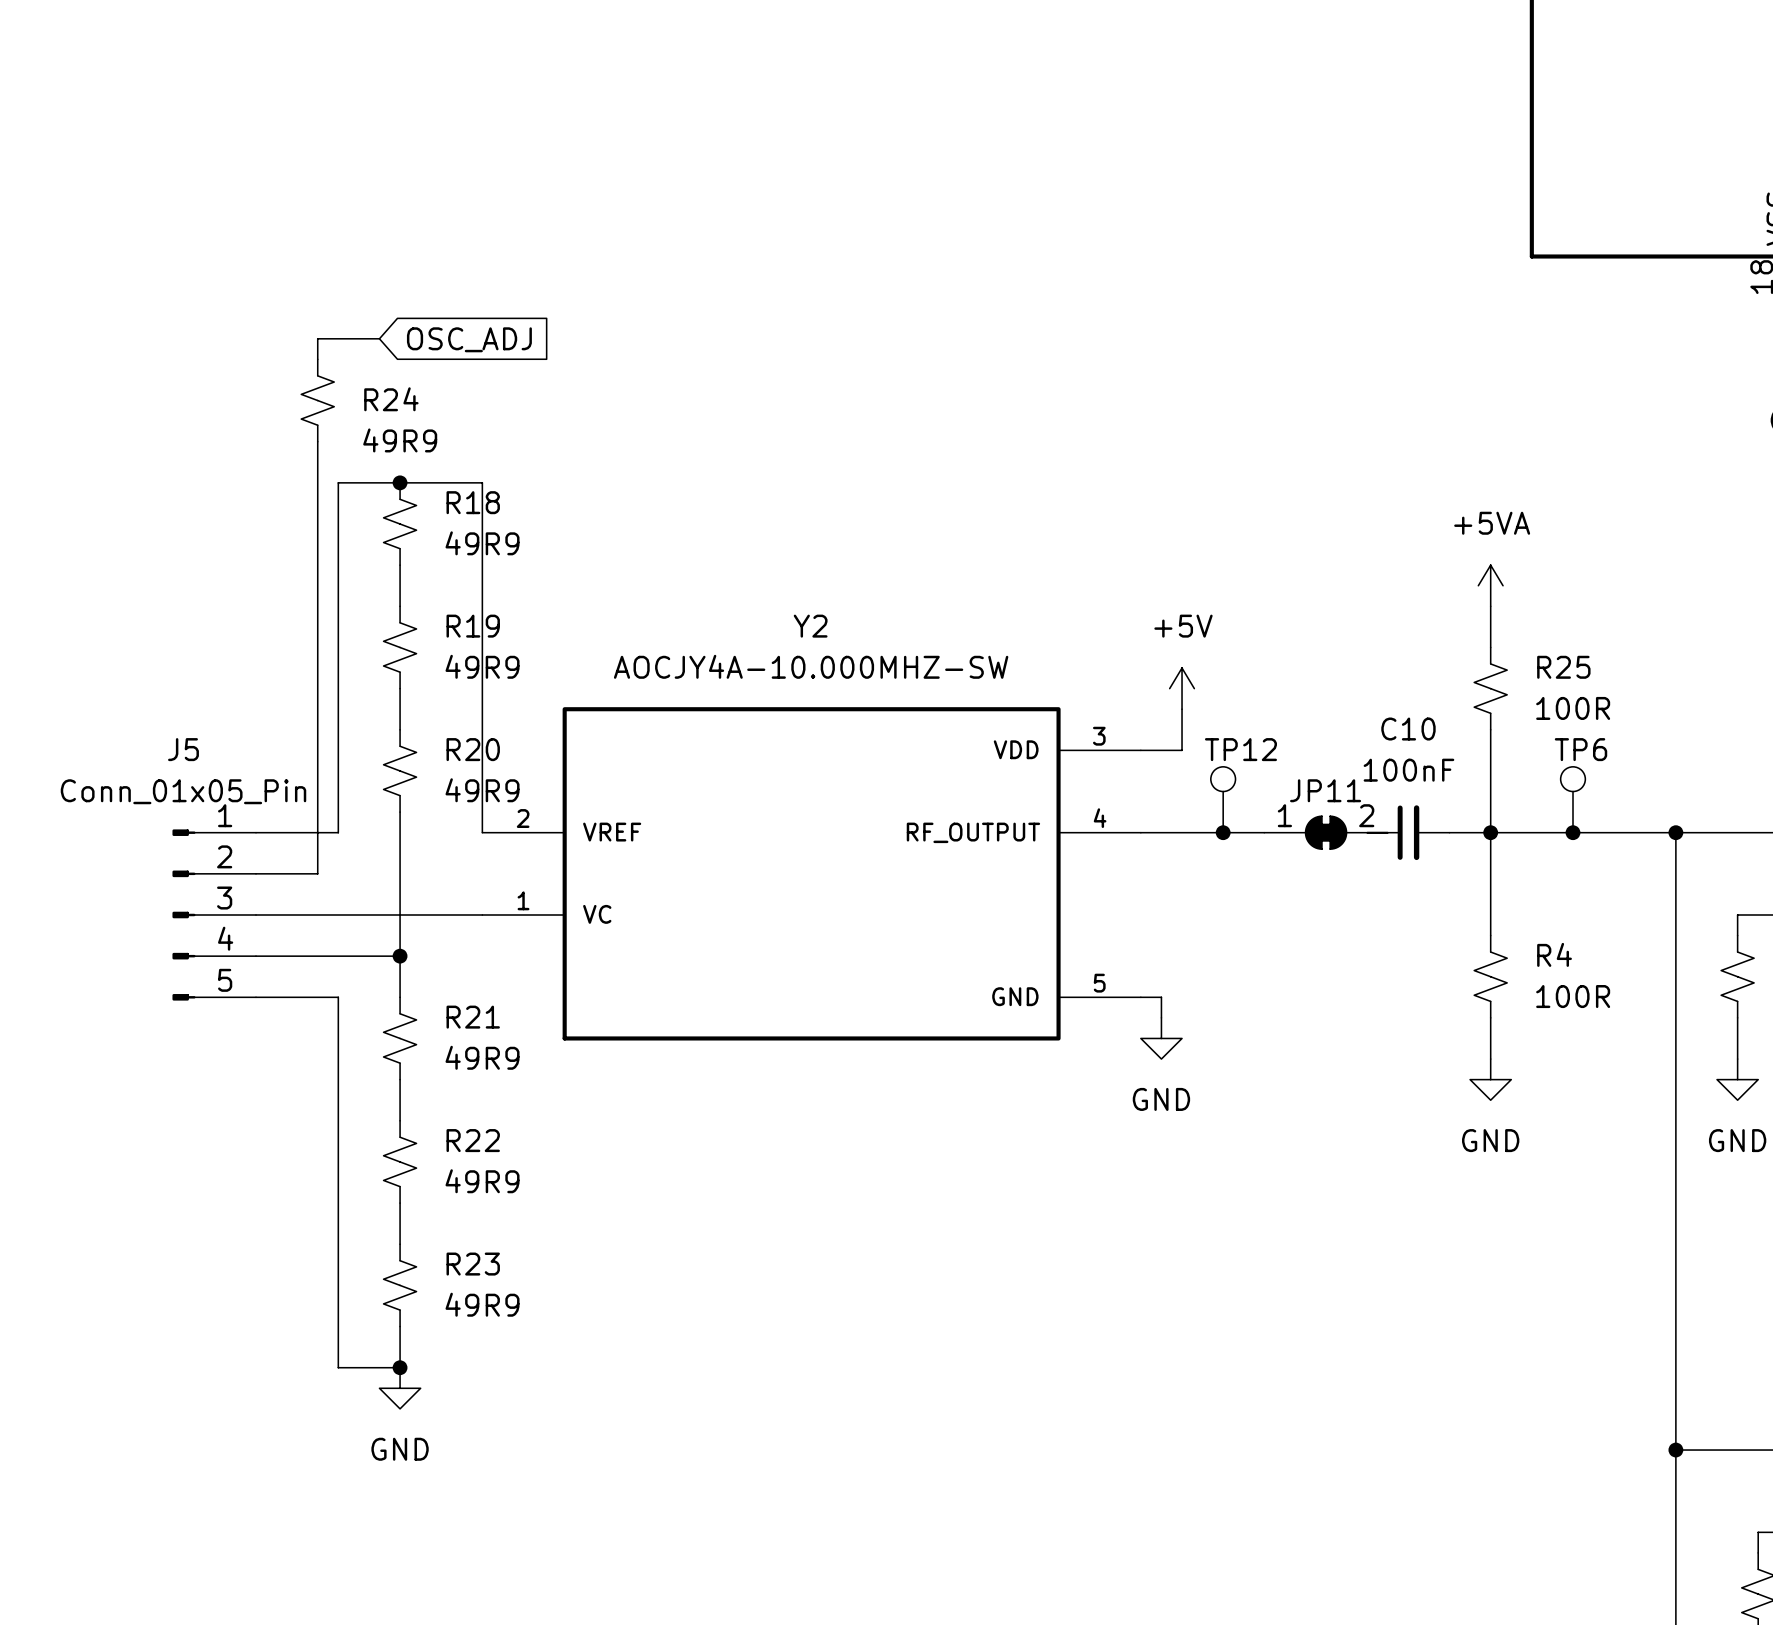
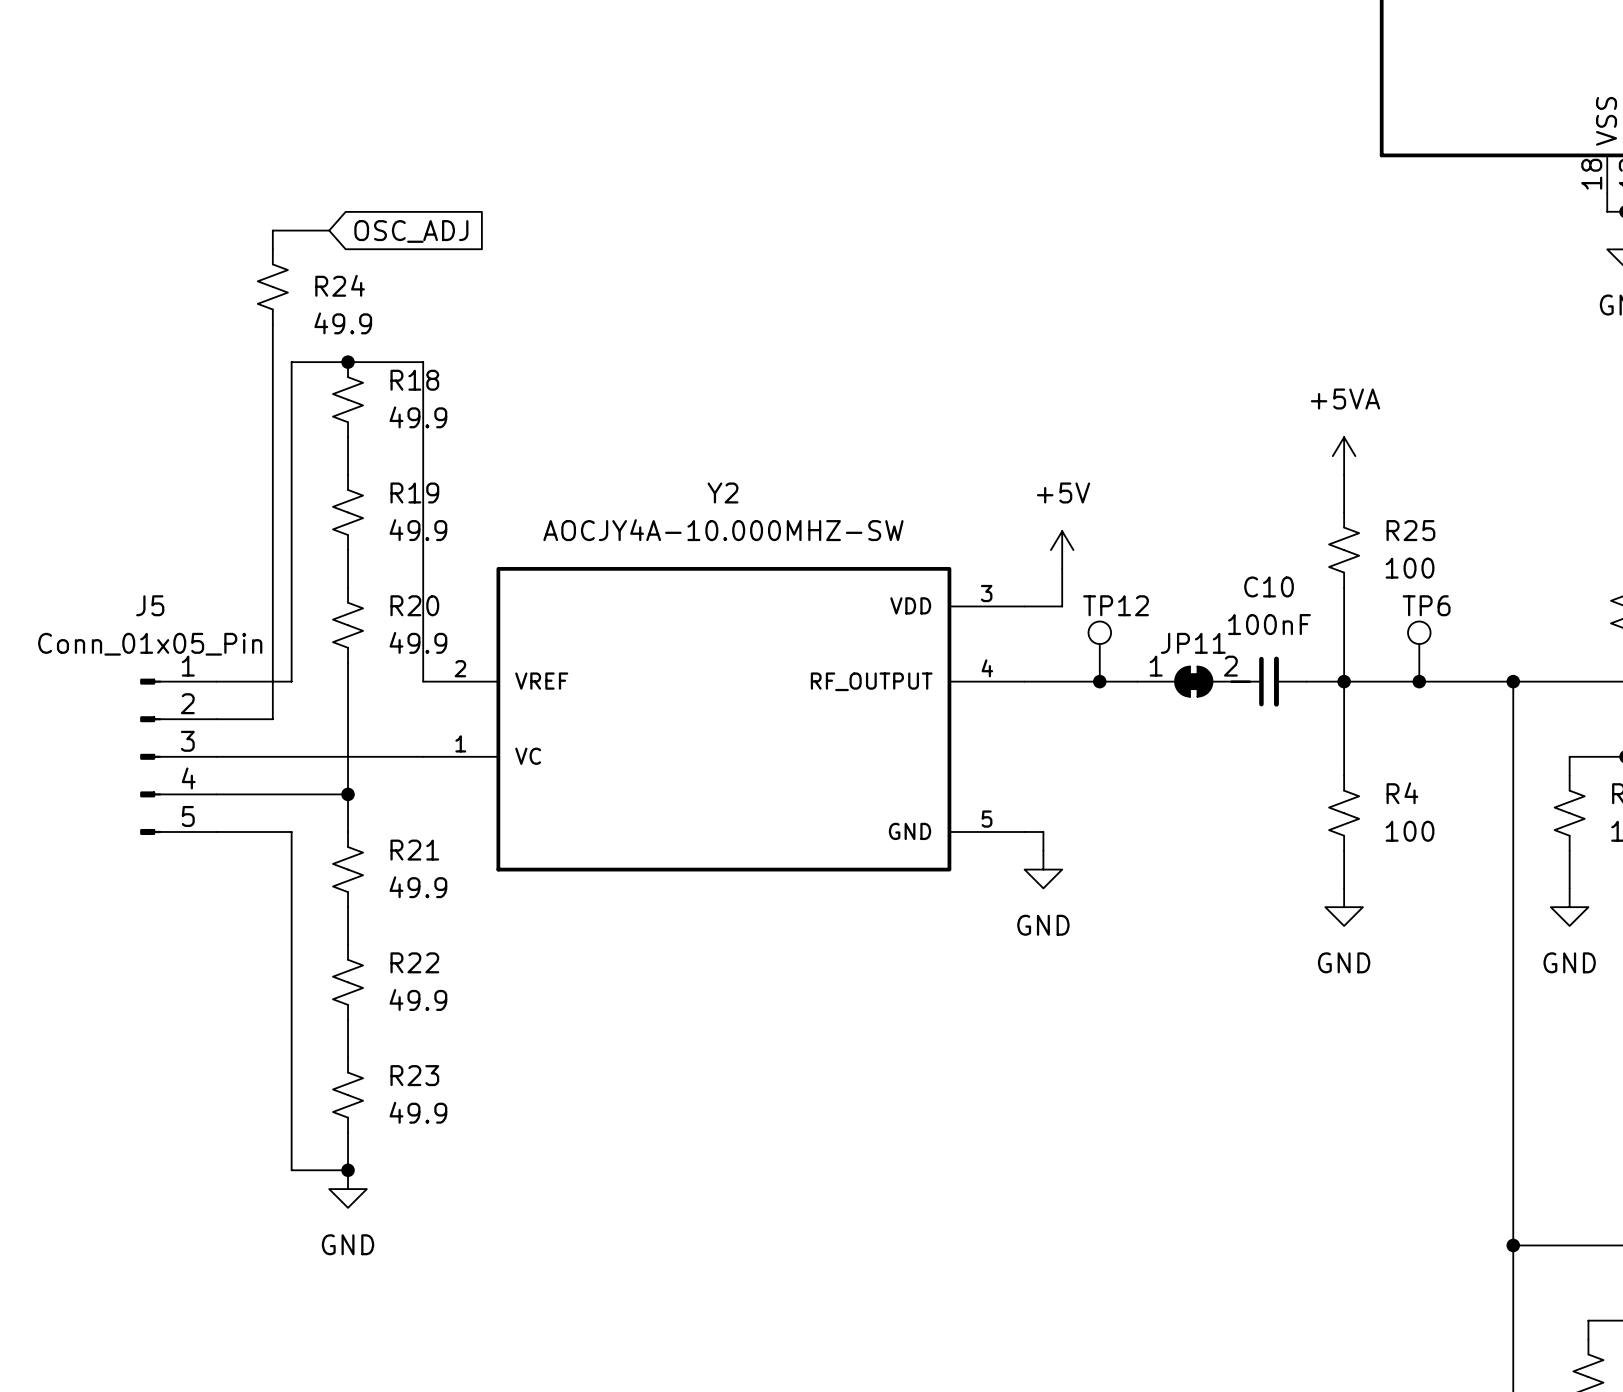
R24 value: 49R9 (400, 440) -> 49.9 (343, 323)
R18 value: 49R9 (482, 543) -> 49.9 (418, 417)
R19 value: 49R9 (482, 666) -> 49.9 (418, 530)
R25 value: 100R (1573, 708) -> 100 (1410, 568)
R20 value: 49R9 (482, 790) -> 49.9 (418, 642)
R4 value: 100R (1573, 996) -> 100 (1410, 831)
R21 value: 49R9 (482, 1057) -> 49.9 (418, 887)
R22 value: 49R9 (482, 1181) -> 49.9 (418, 999)
R23 value: 49R9 (482, 1304) -> 49.9 (418, 1112)

